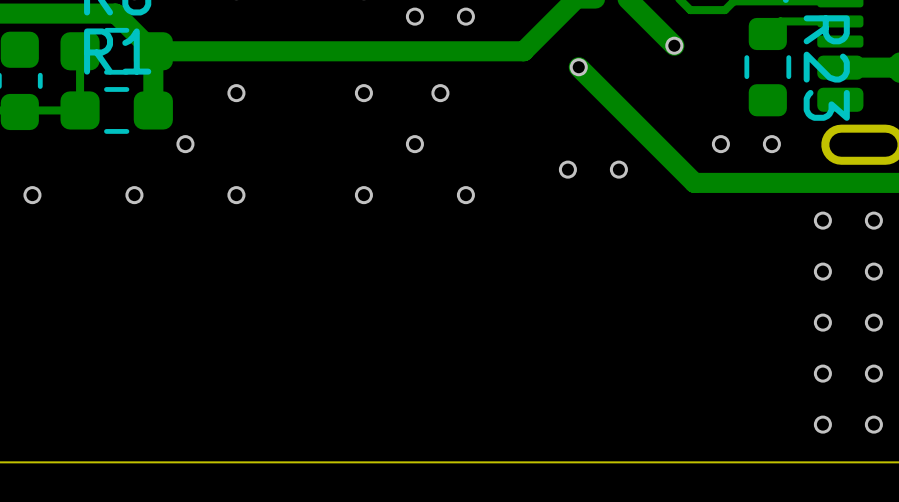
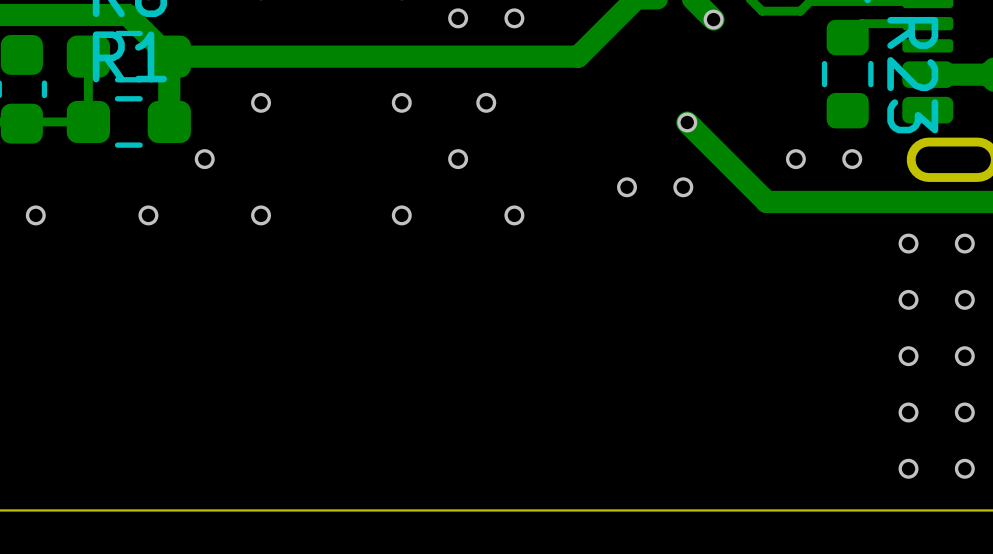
track: (646, 17) (674, 45) -> none
via position: (674, 45) -> (713, 19)
track: (578, 67) (622, 110) -> none
via: (578, 67) -> none
via: none -> (687, 122)

